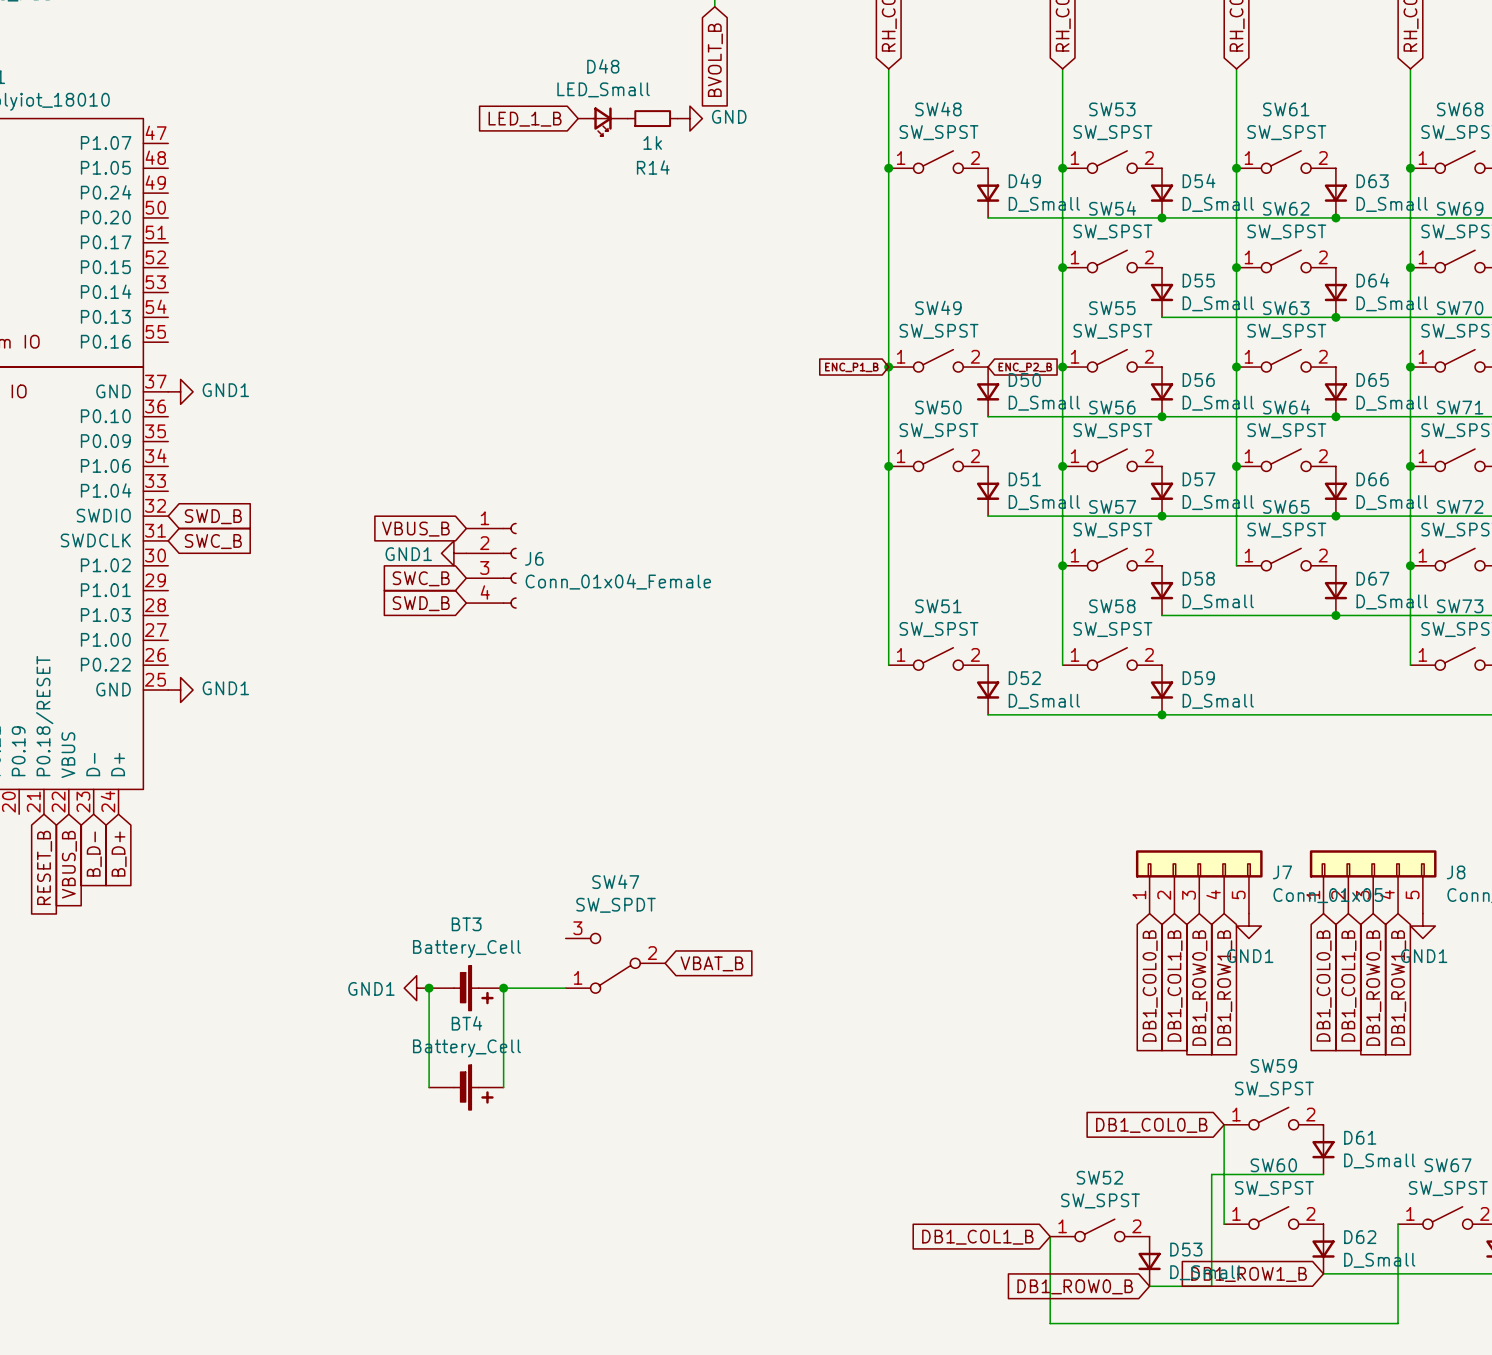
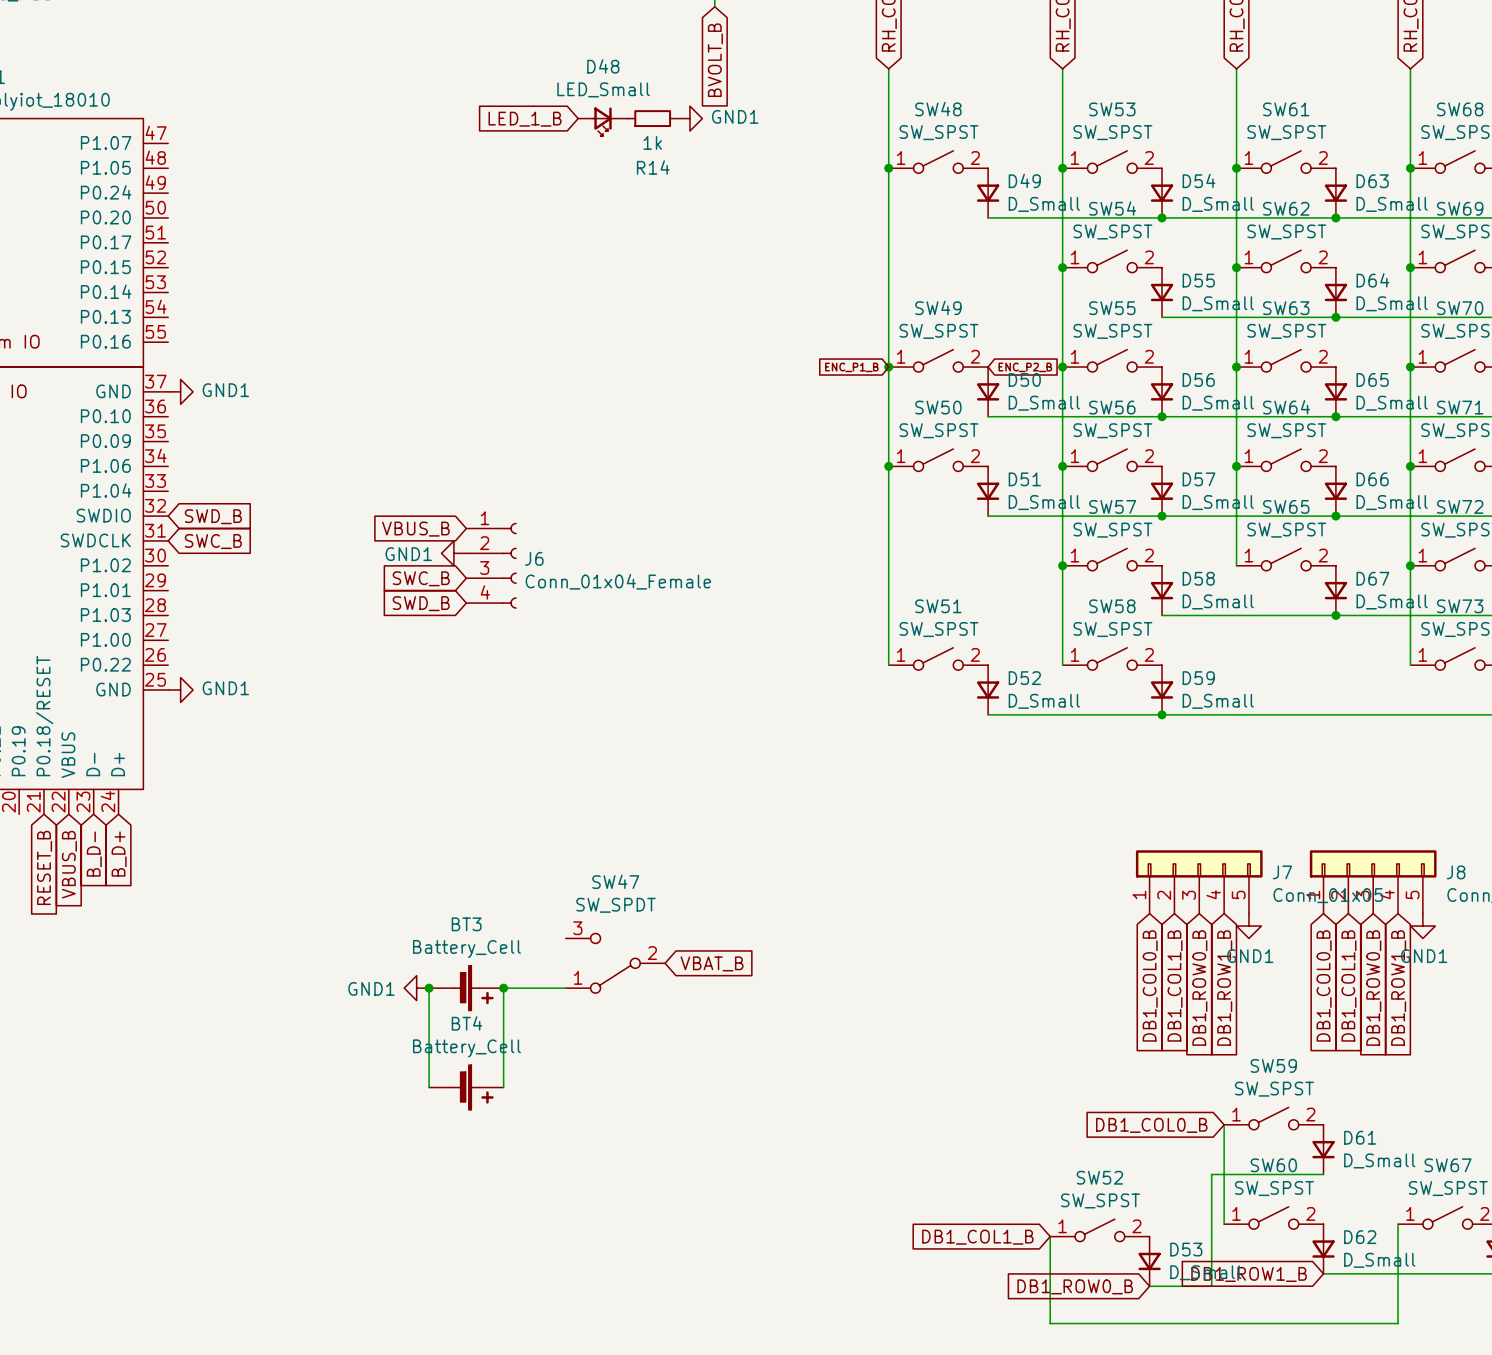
power symbol: GND (689, 118) -> GND1 (689, 118)

